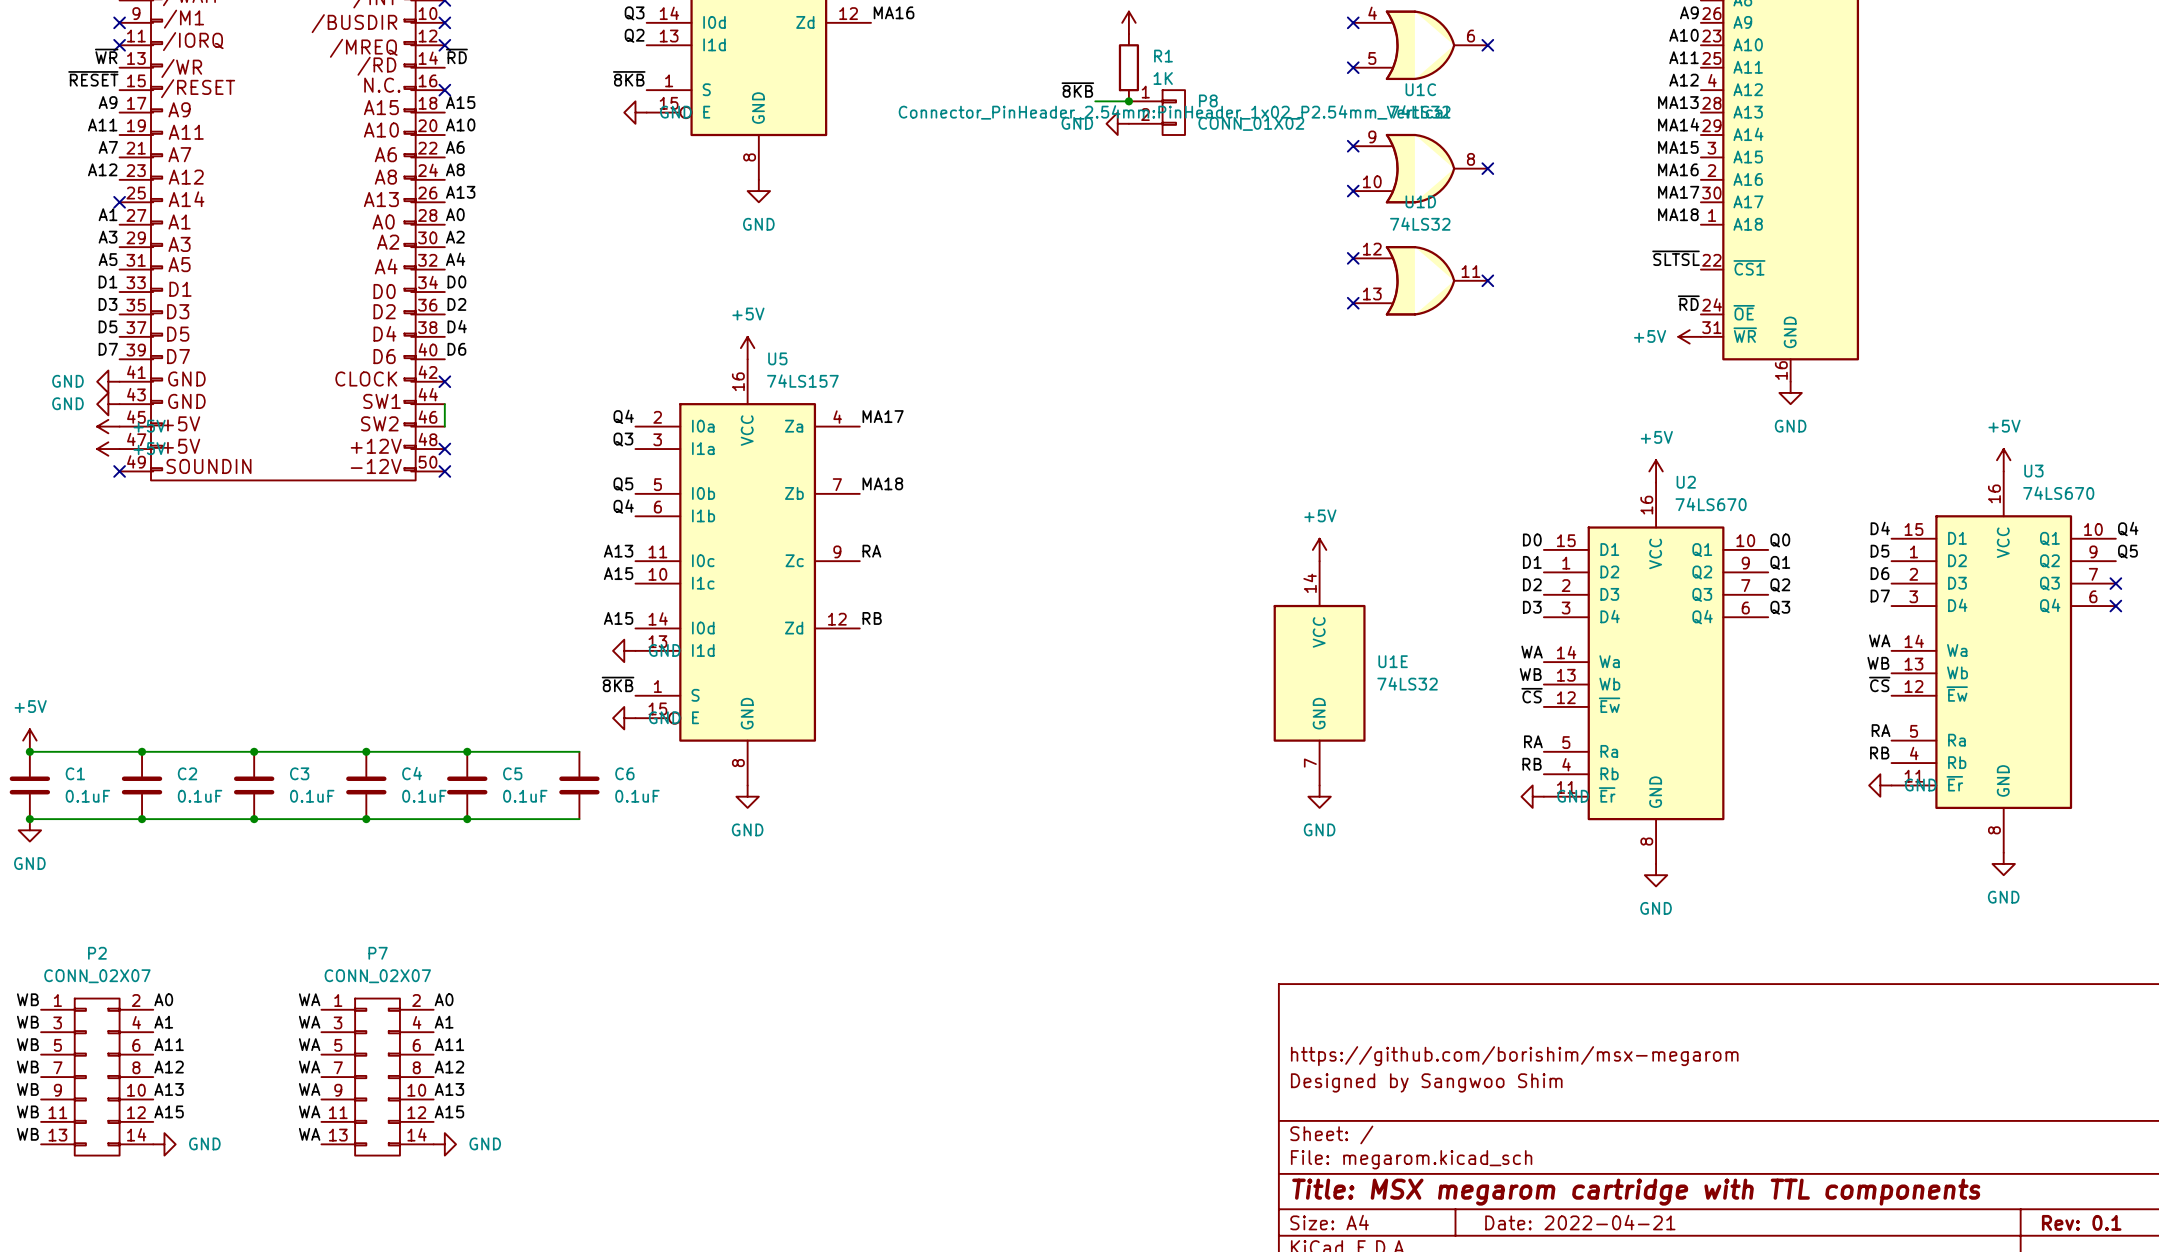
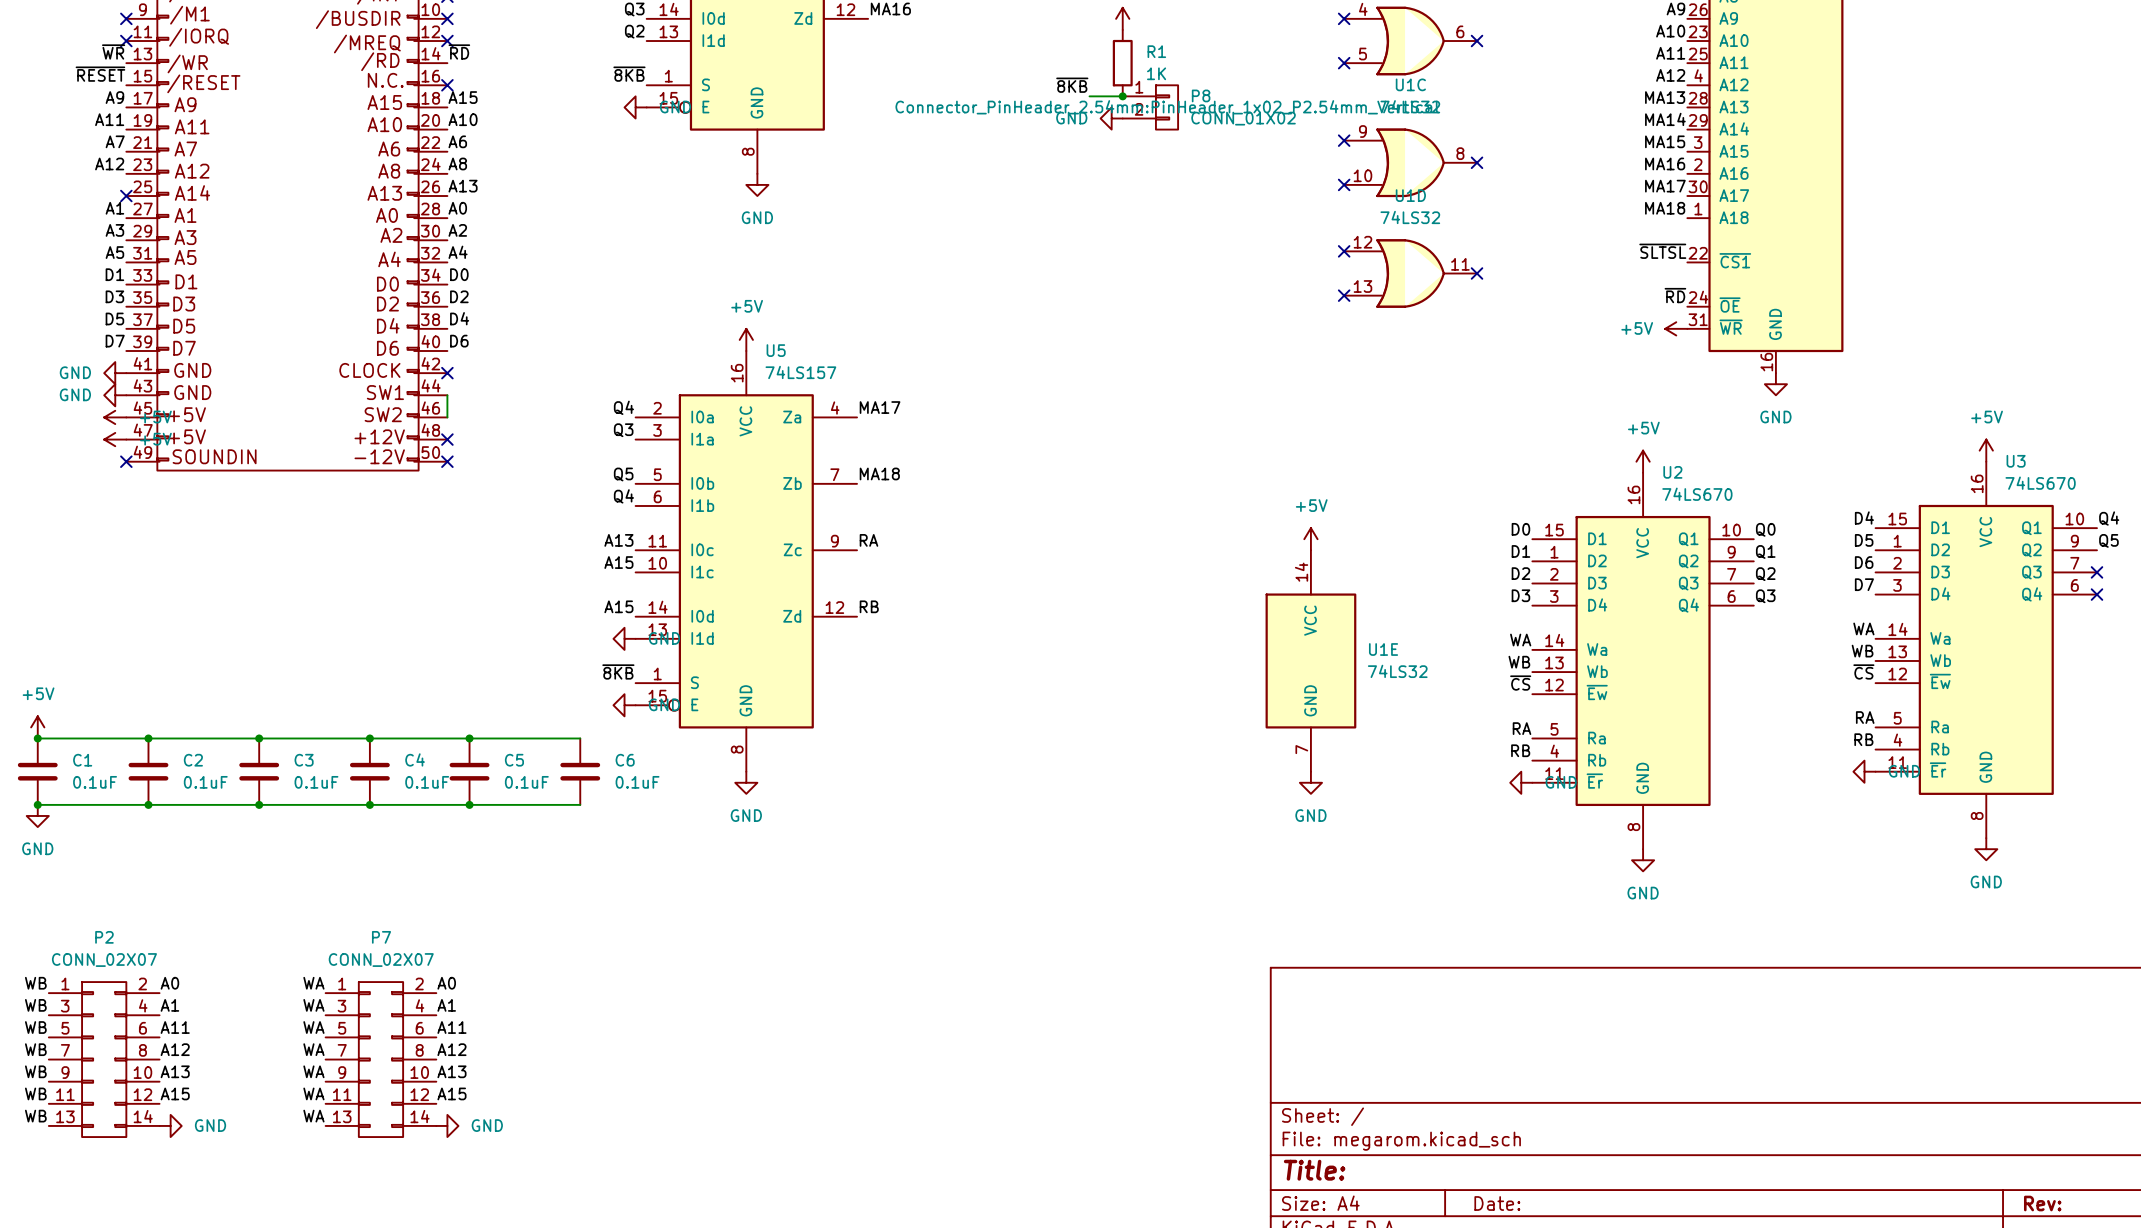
title block: https://github.com/borishim/msx-megarom (1514, 1056) -> none
title block: Designed by Sangwoo Shim (1426, 1082) -> none
title block: Title: MSX megarom cartridge with TTL components (1636, 1192) -> Title: (1314, 1170)
title block: Date: 2022-04-21 (1580, 1222) -> Date: (1497, 1203)
title block: Rev: 0.1 (2081, 1222) -> Rev: (2042, 1203)

